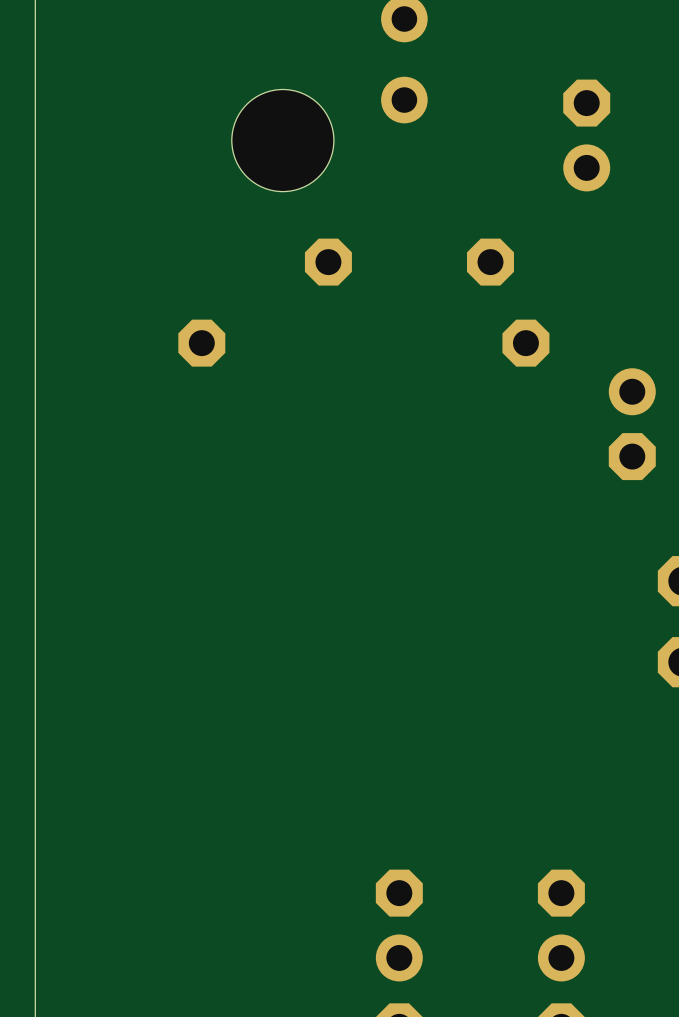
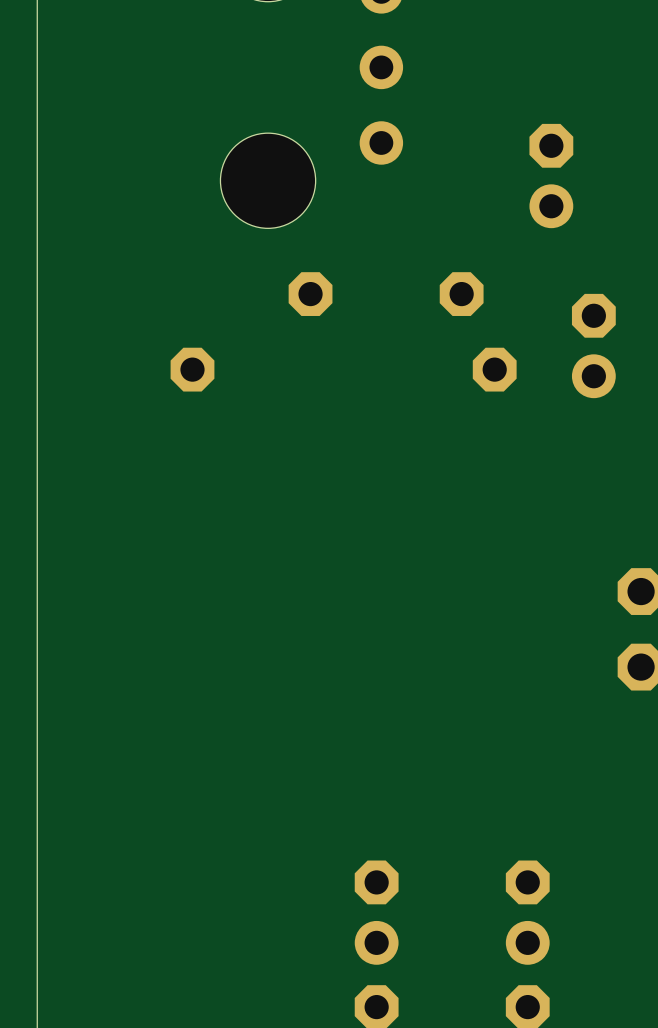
part rotation: 0° (632, 424) -> 180° (593, 346)
part position: (632, 424) -> (593, 346)

